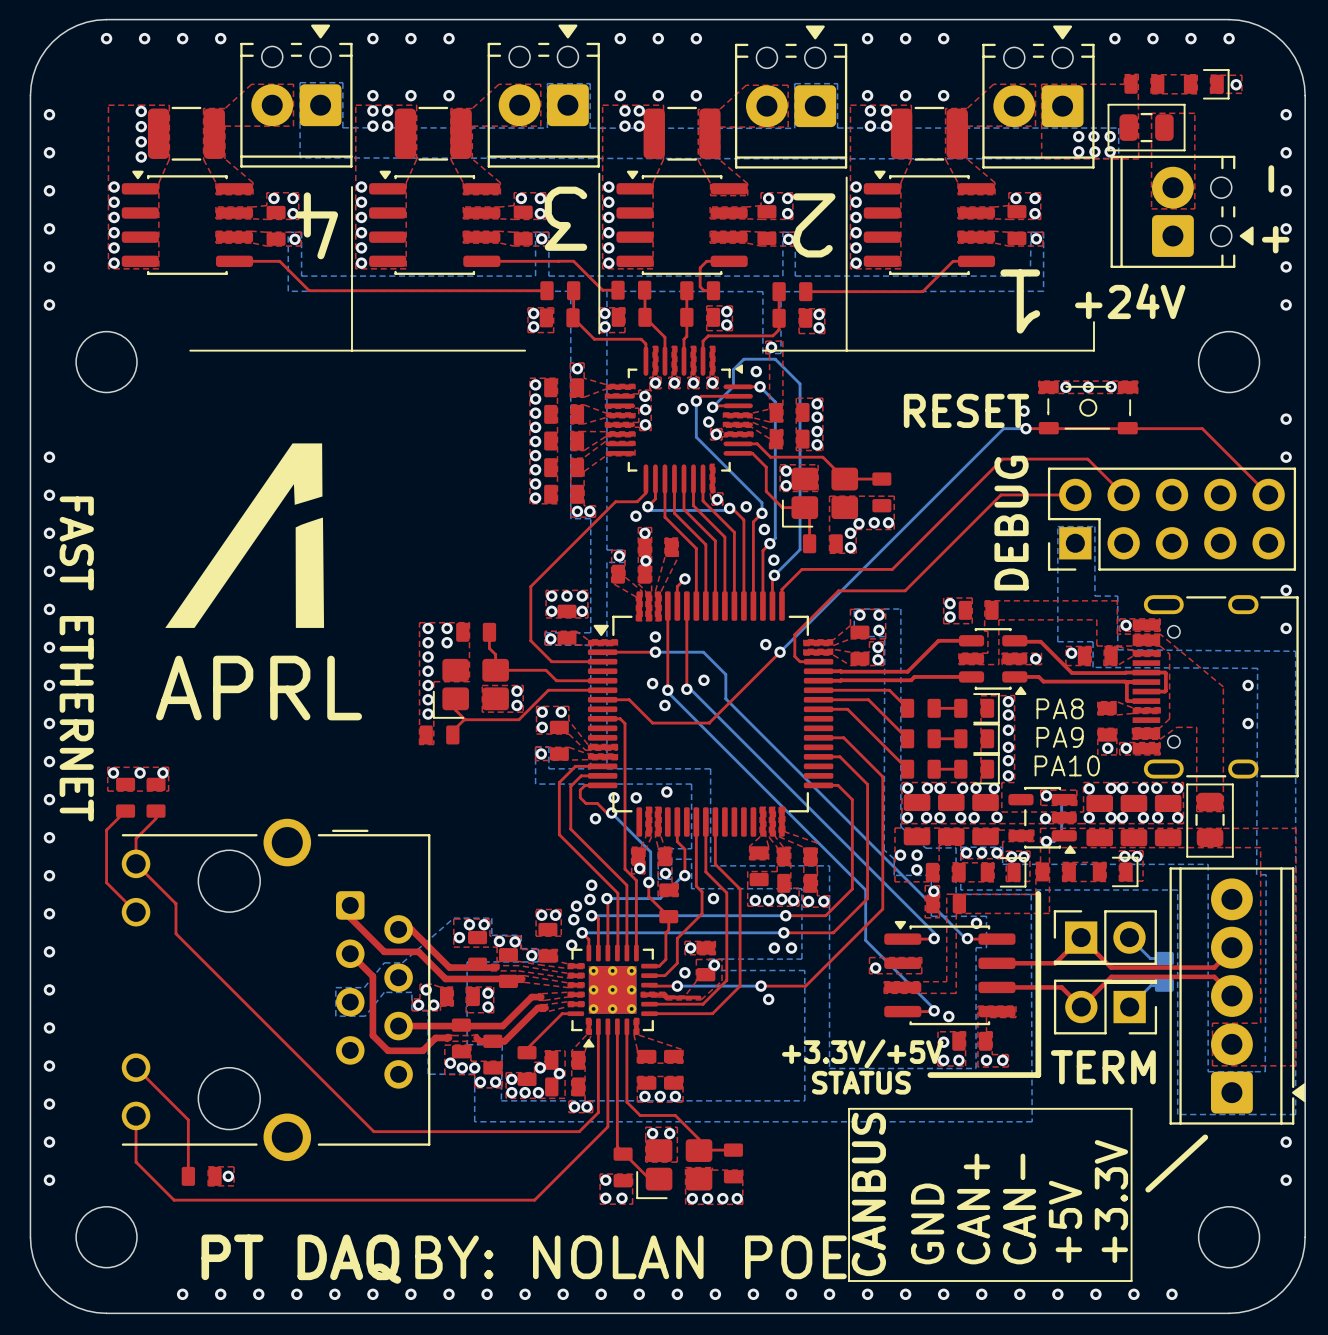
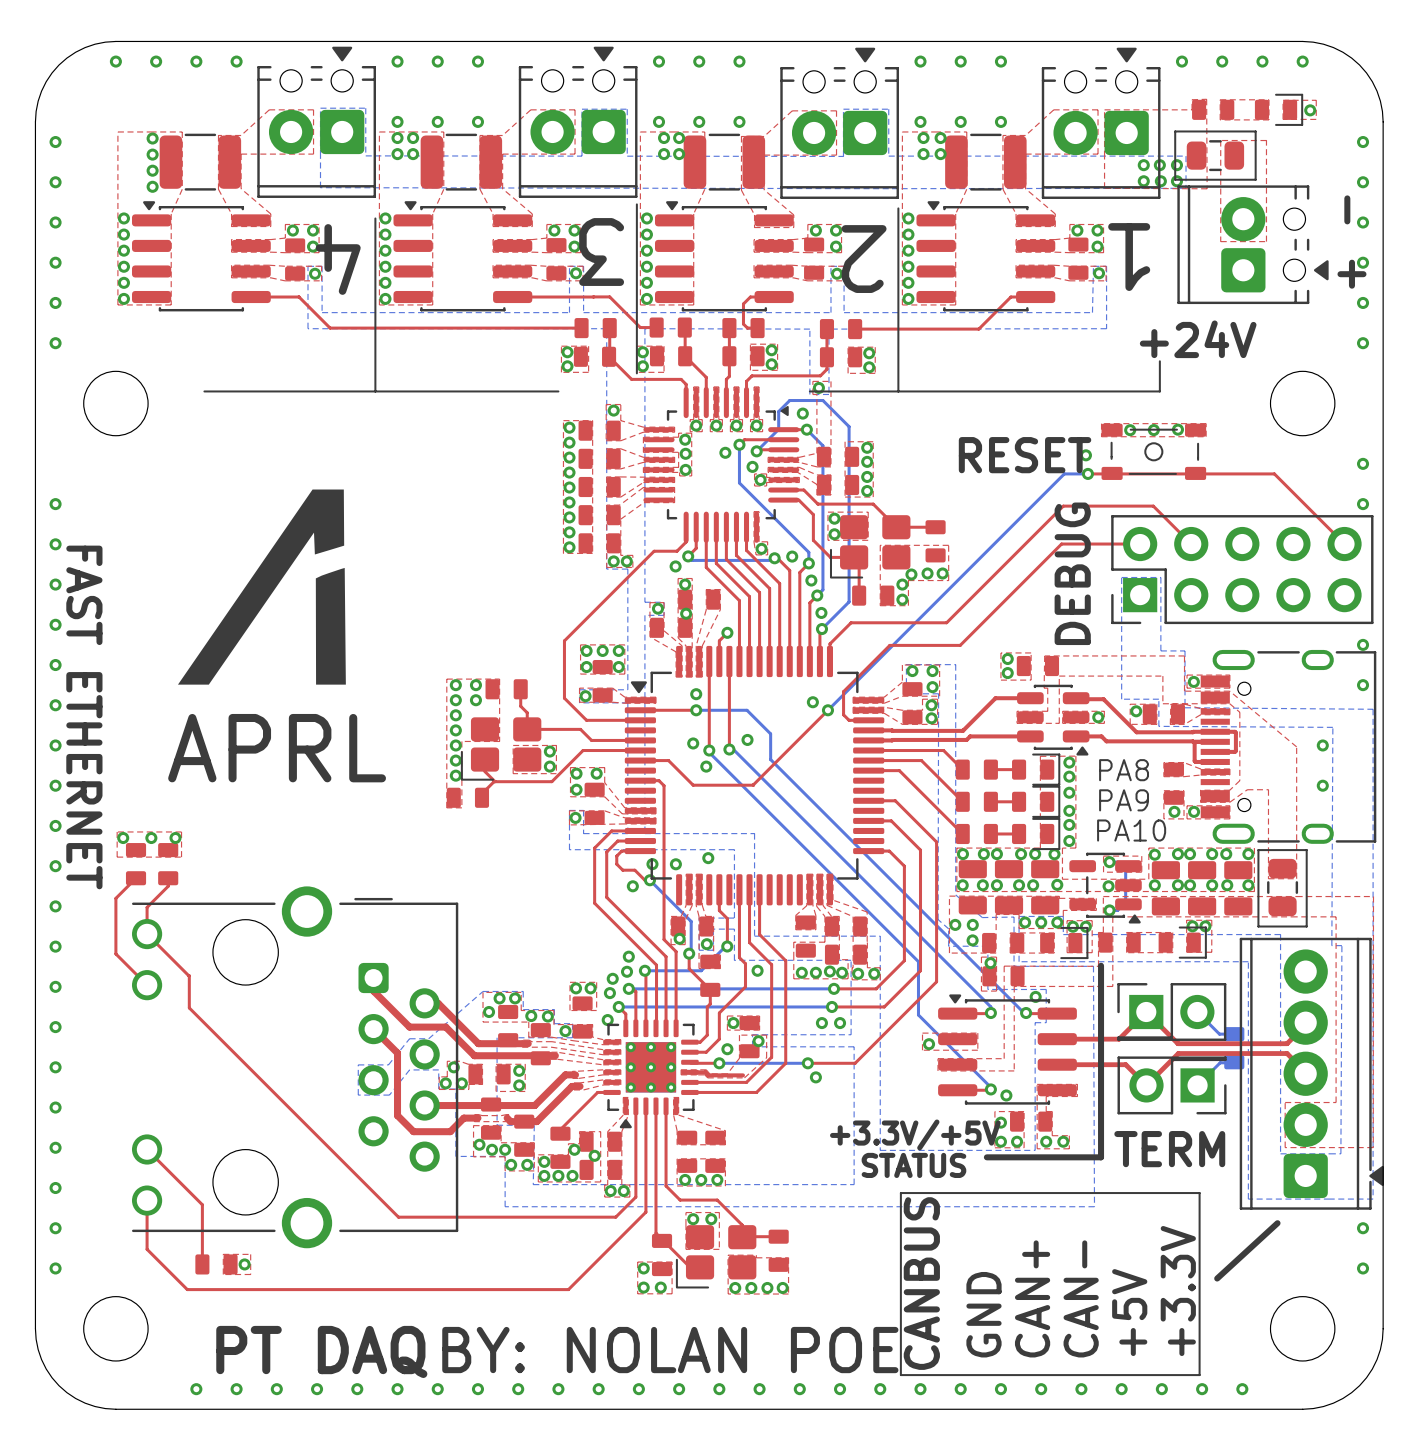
text position: 1 (1020, 301) -> 1 (1129, 257)

